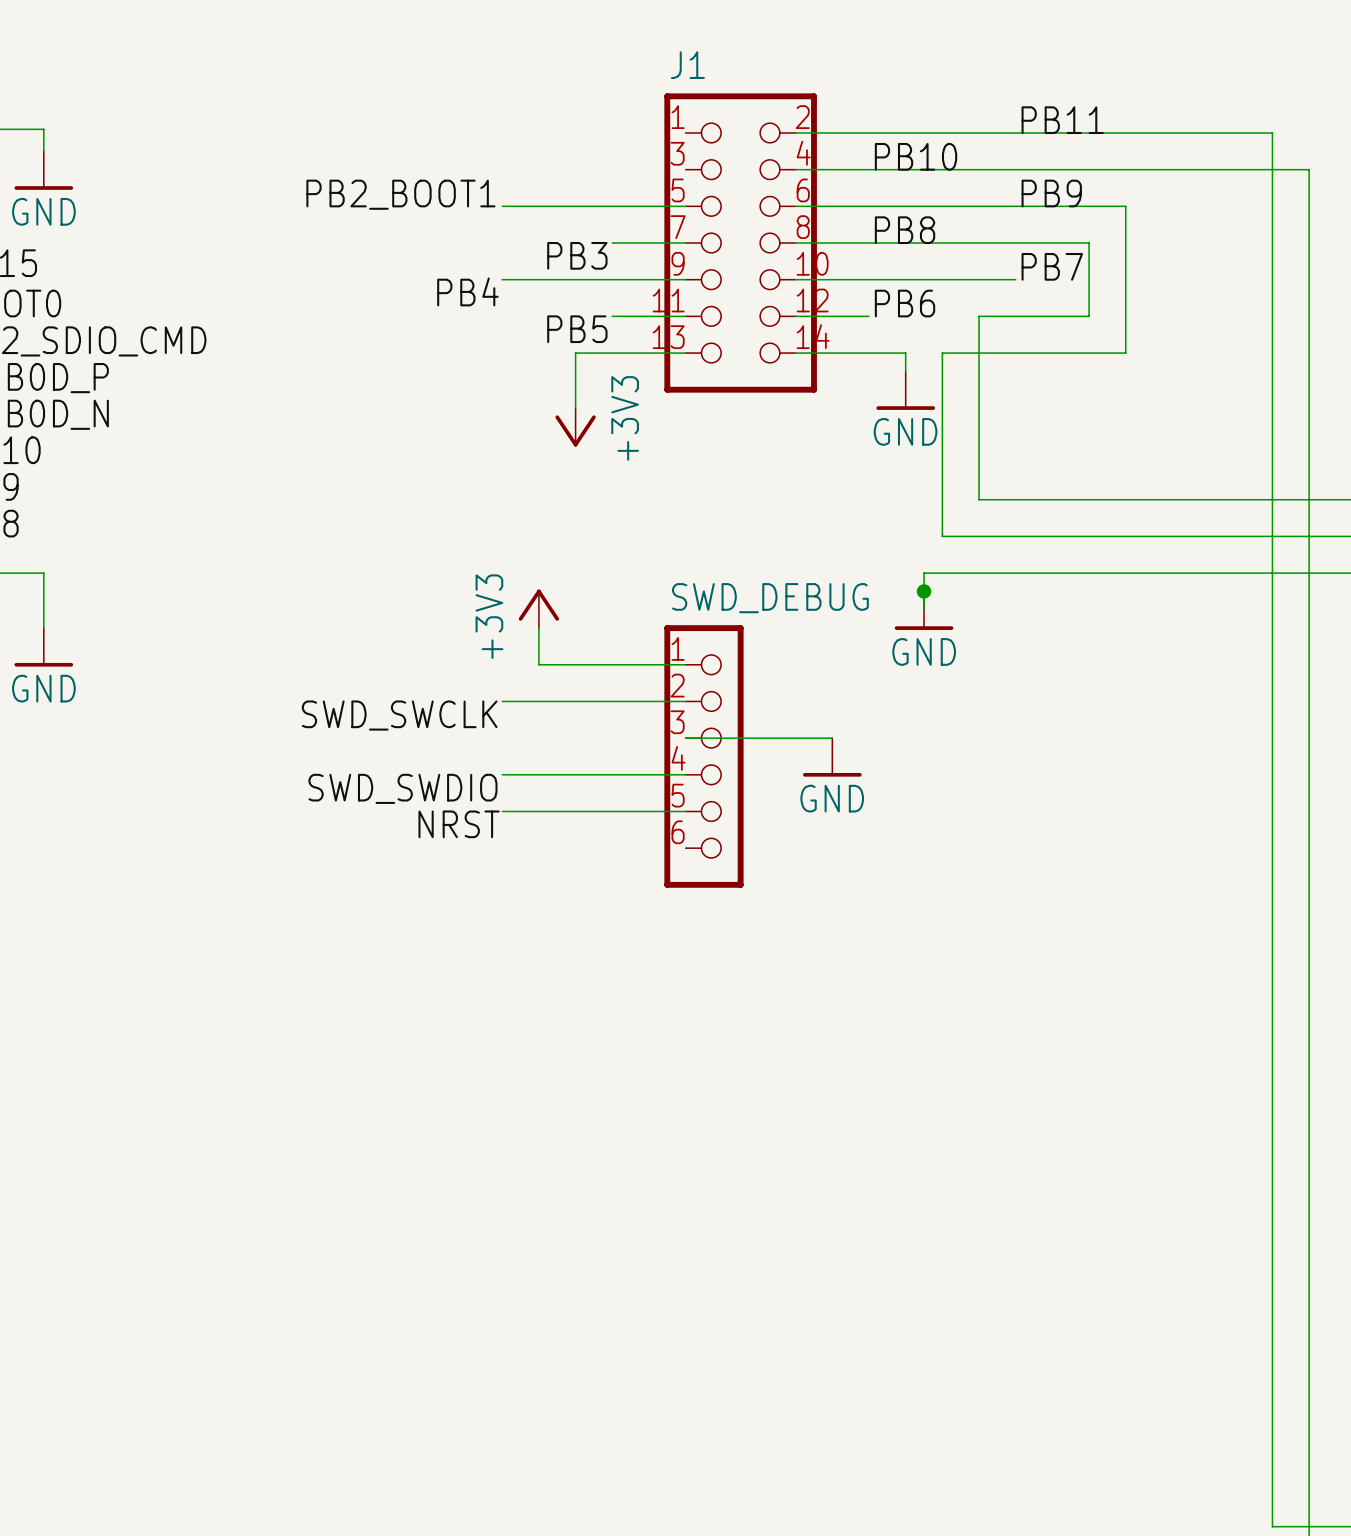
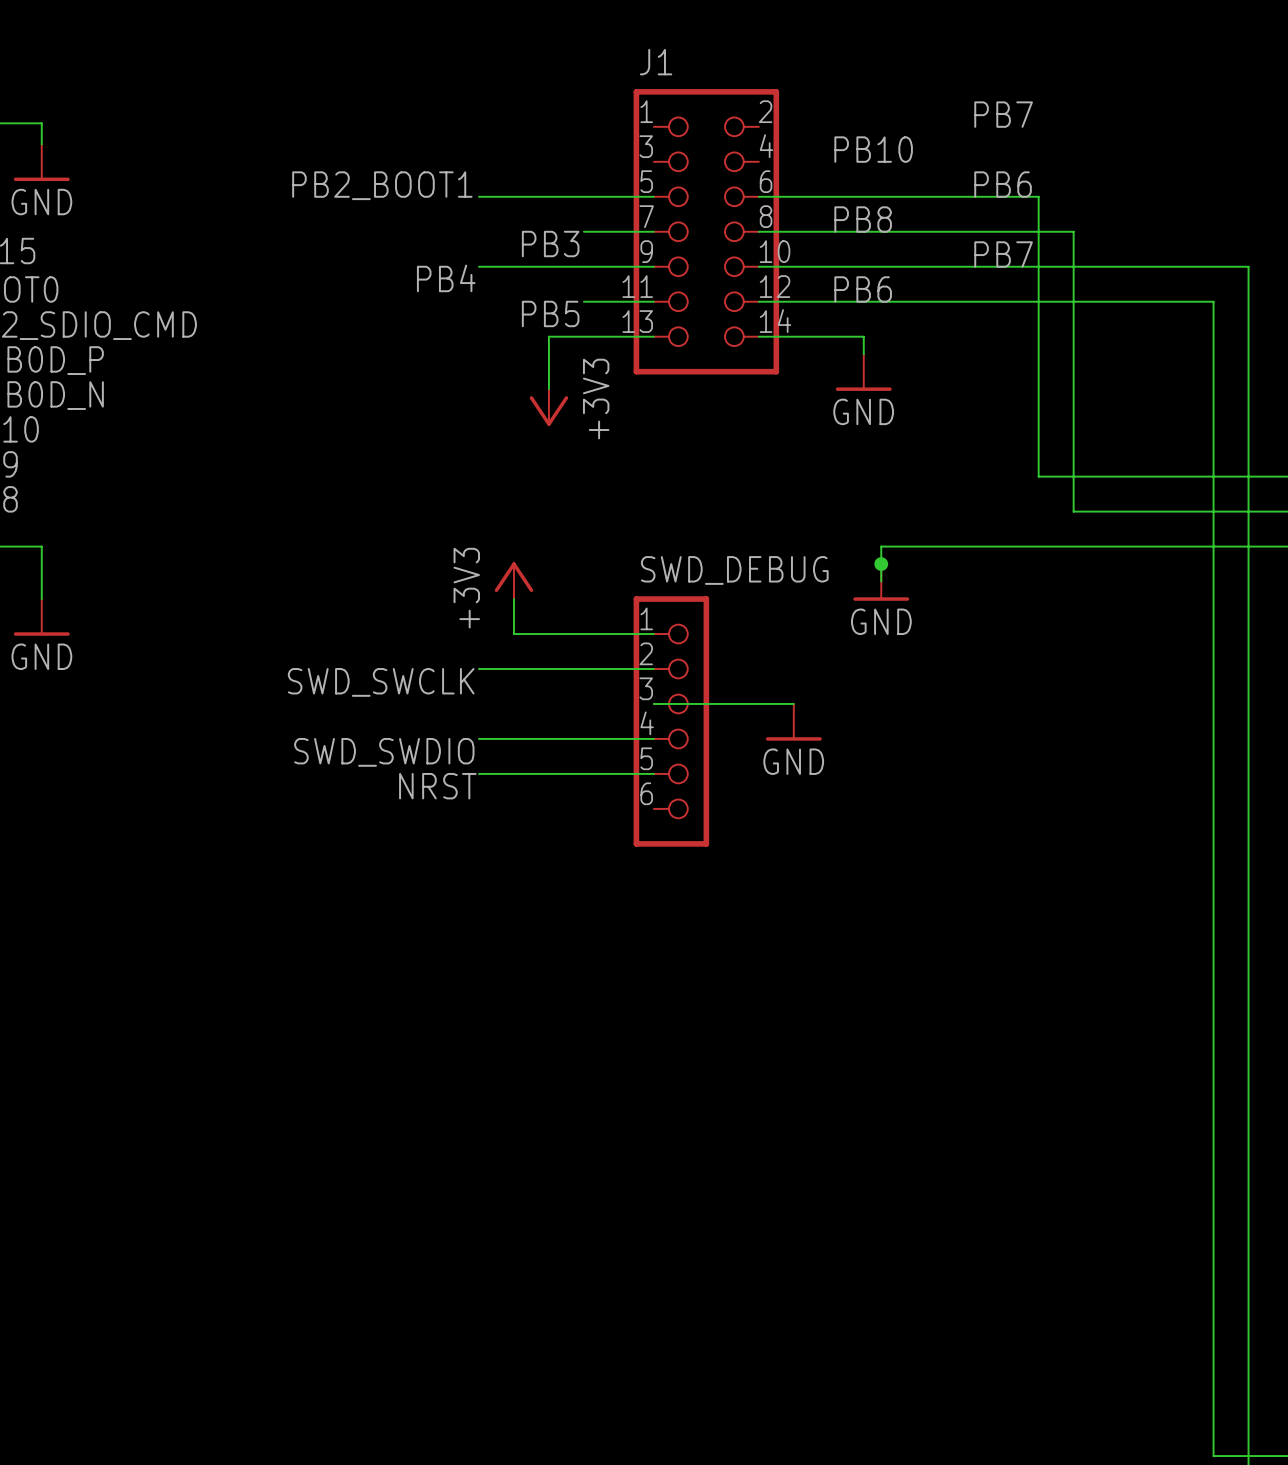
label: PB11 (1062, 120) -> PB7 (1003, 114)
wire: (795, 132) (1272, 132) (1272, 316) -> (1038, 476) (1038, 301) (1213, 301)
wire: (795, 169) (1309, 169) (1309, 279) -> (968, 266) (1248, 266)
label: PB9 (1051, 193) -> PB6 (1003, 184)
wire: (1089, 206) (1125, 206) (1125, 243) -> (1038, 196) (1038, 231) (1073, 231)
wire: (979, 316) (979, 499) (1089, 499) -> (933, 301) (828, 301)
wire: (1125, 353) (942, 353) (942, 536) (1125, 536) -> (1073, 336) (1073, 511)

